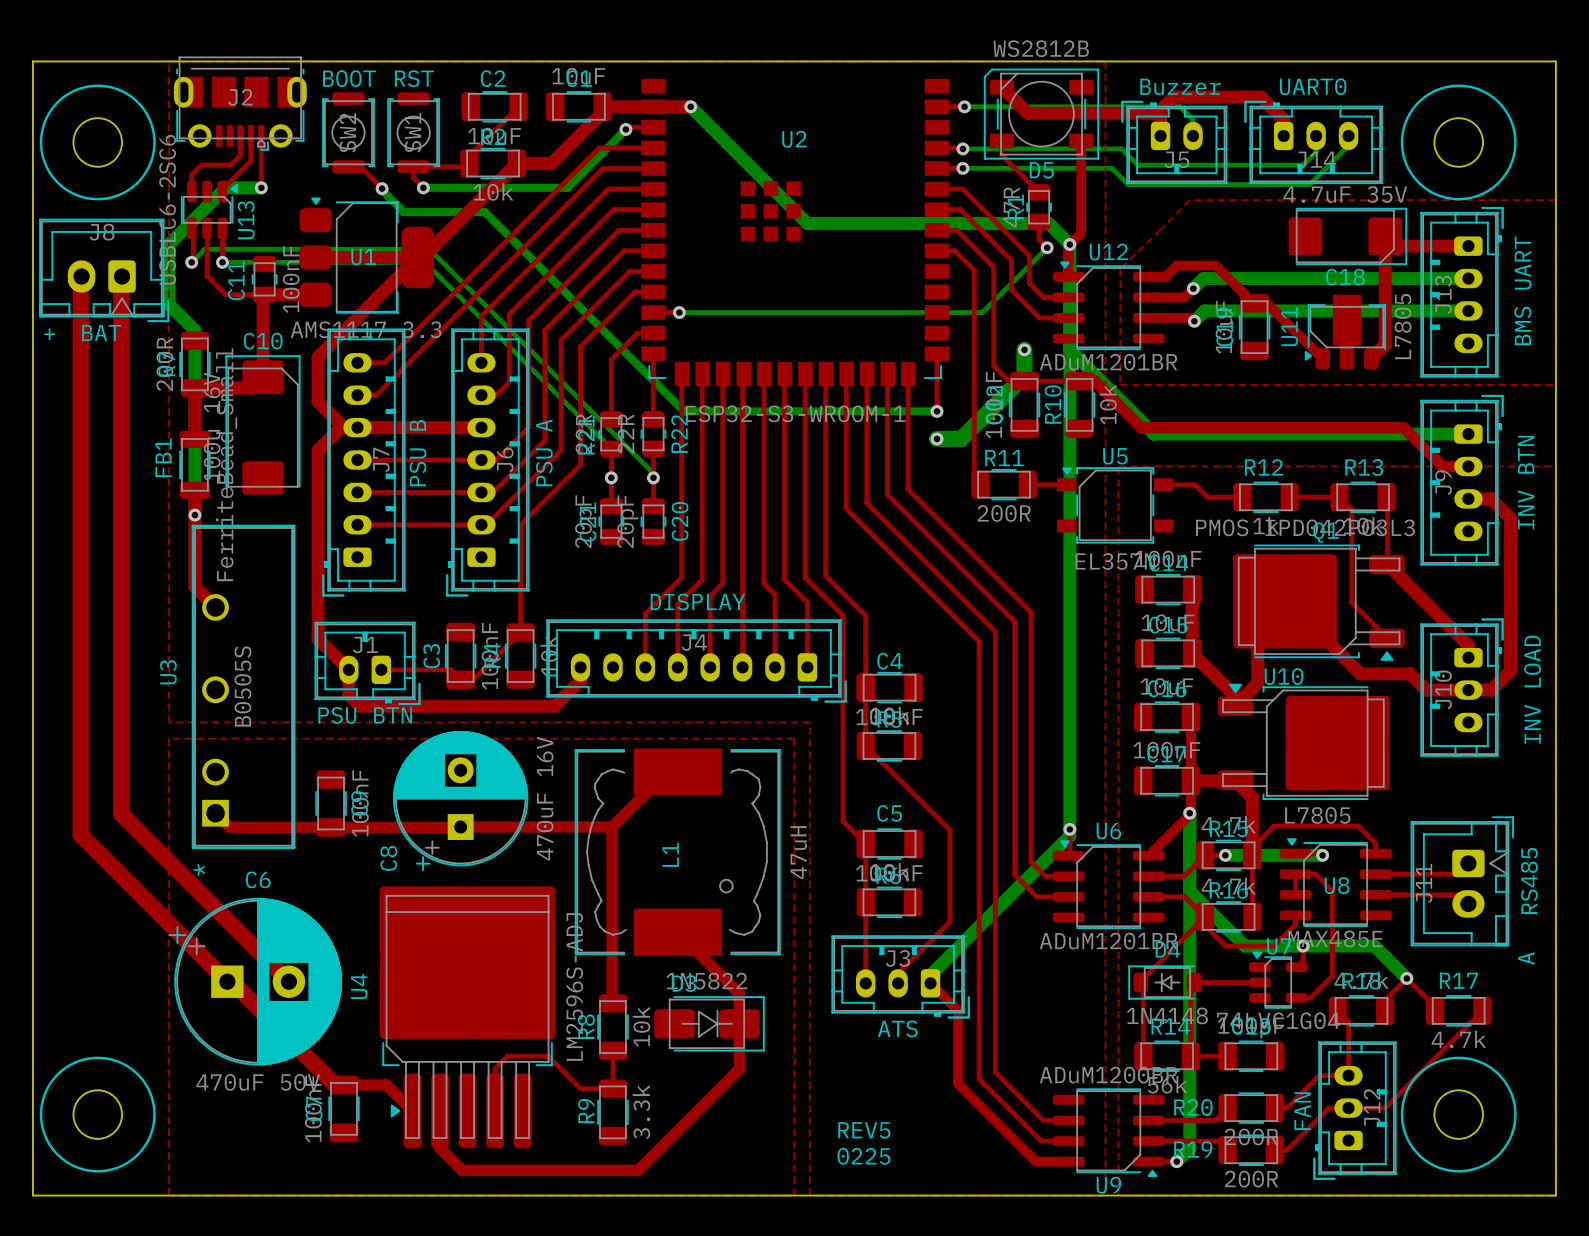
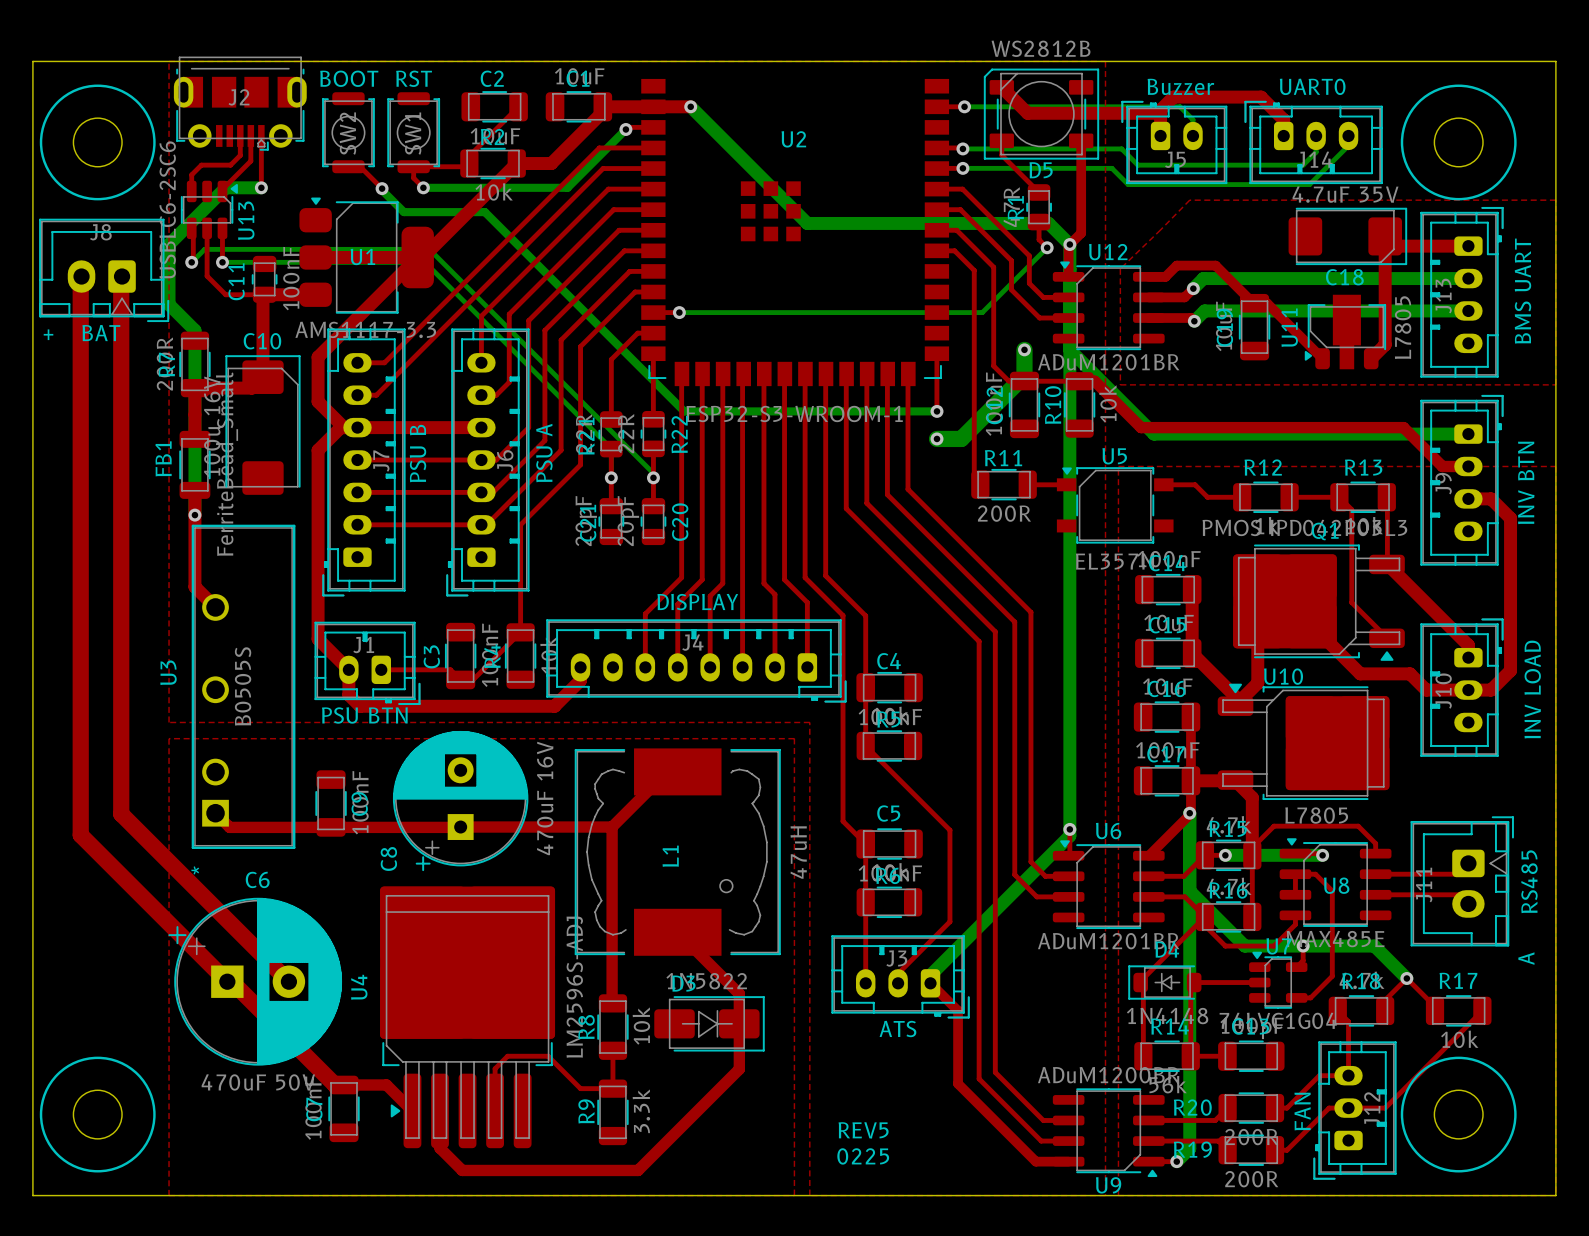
R17 value: 4.7k (1458, 1039) -> 10k (1459, 1039)

